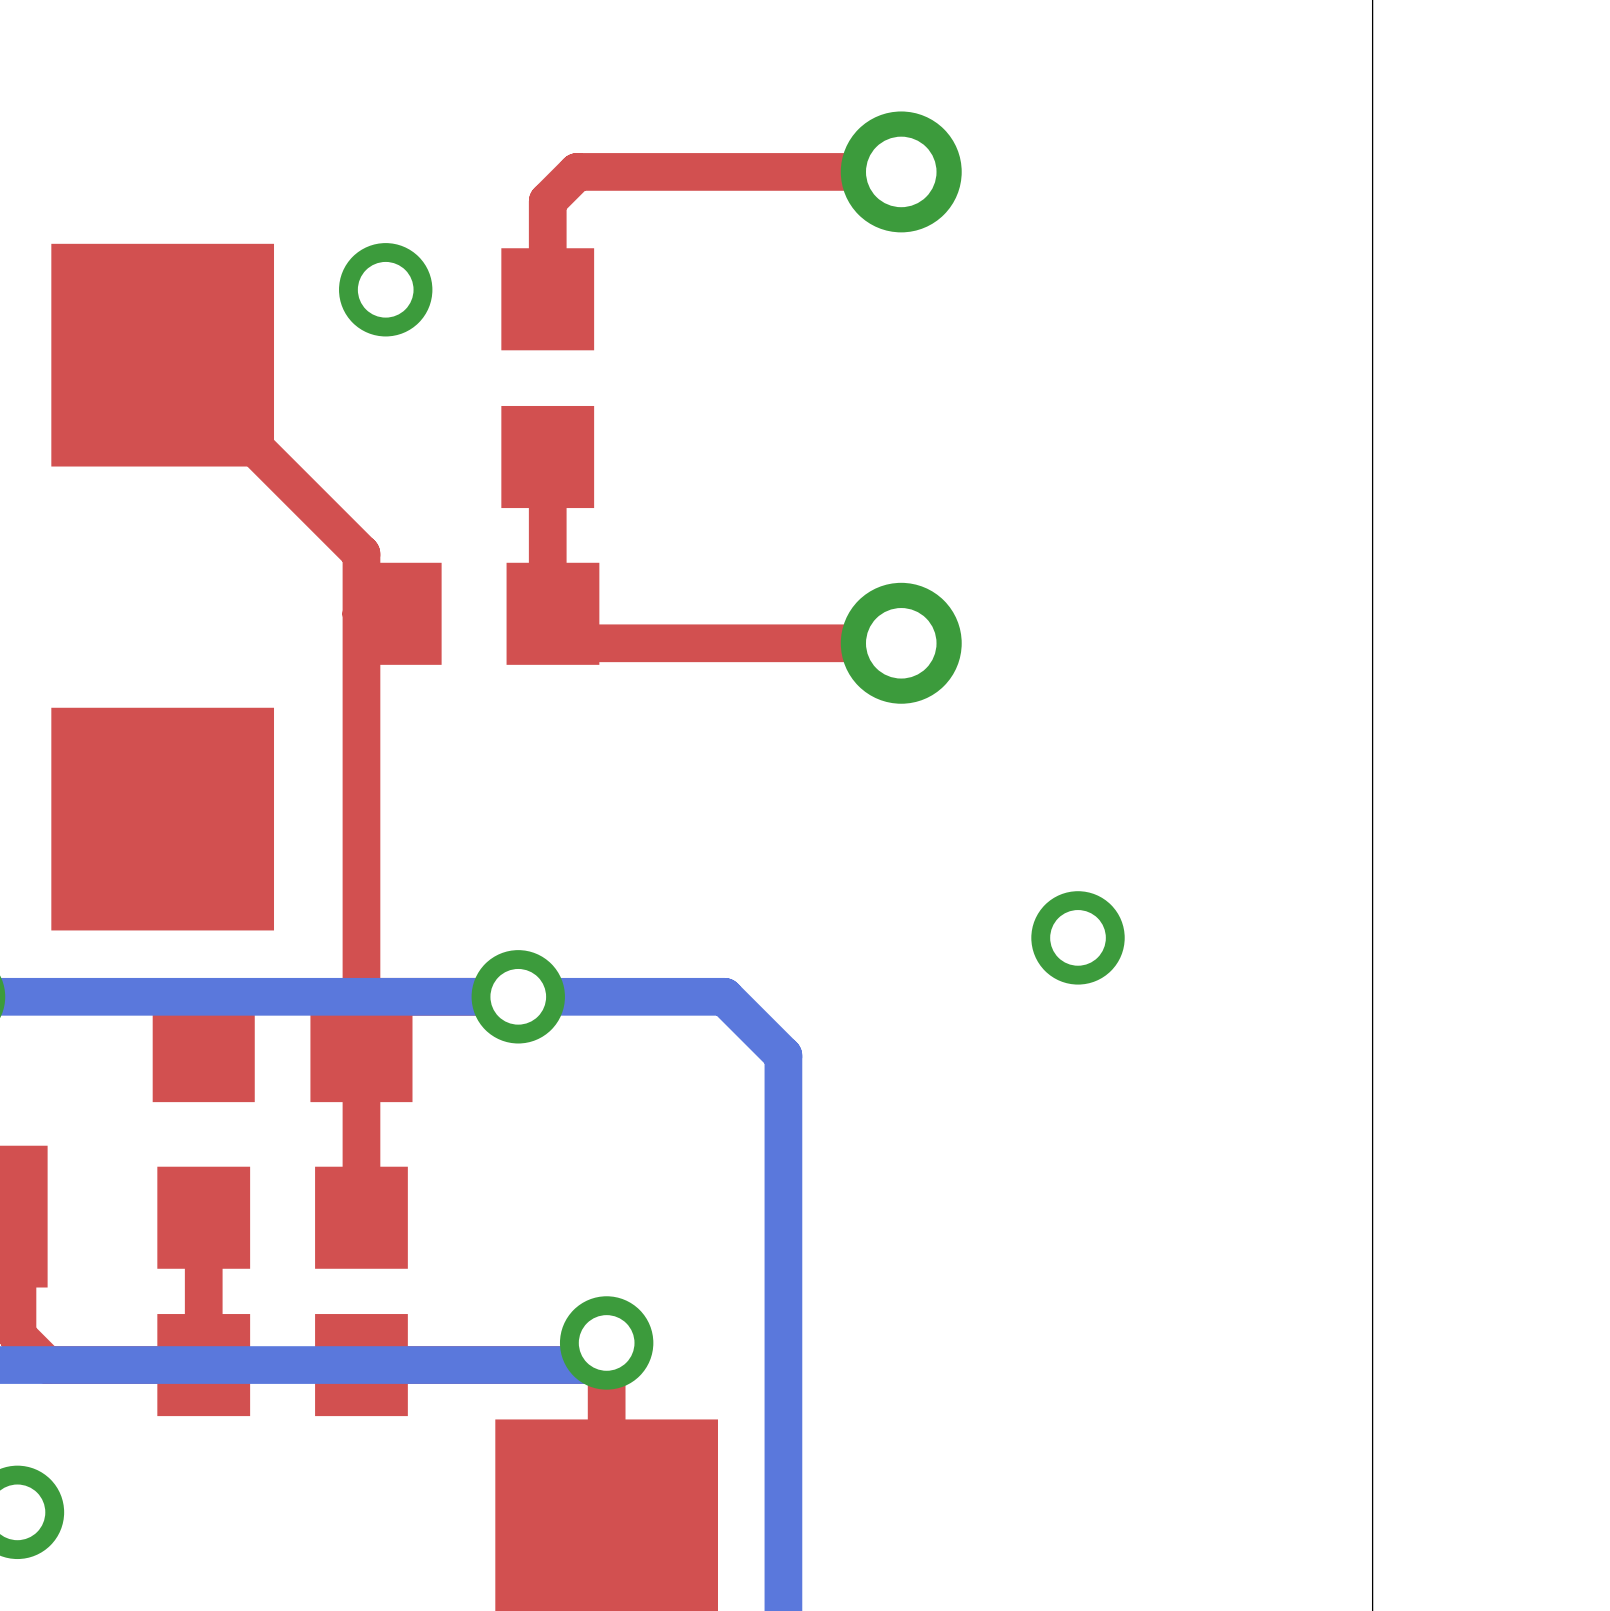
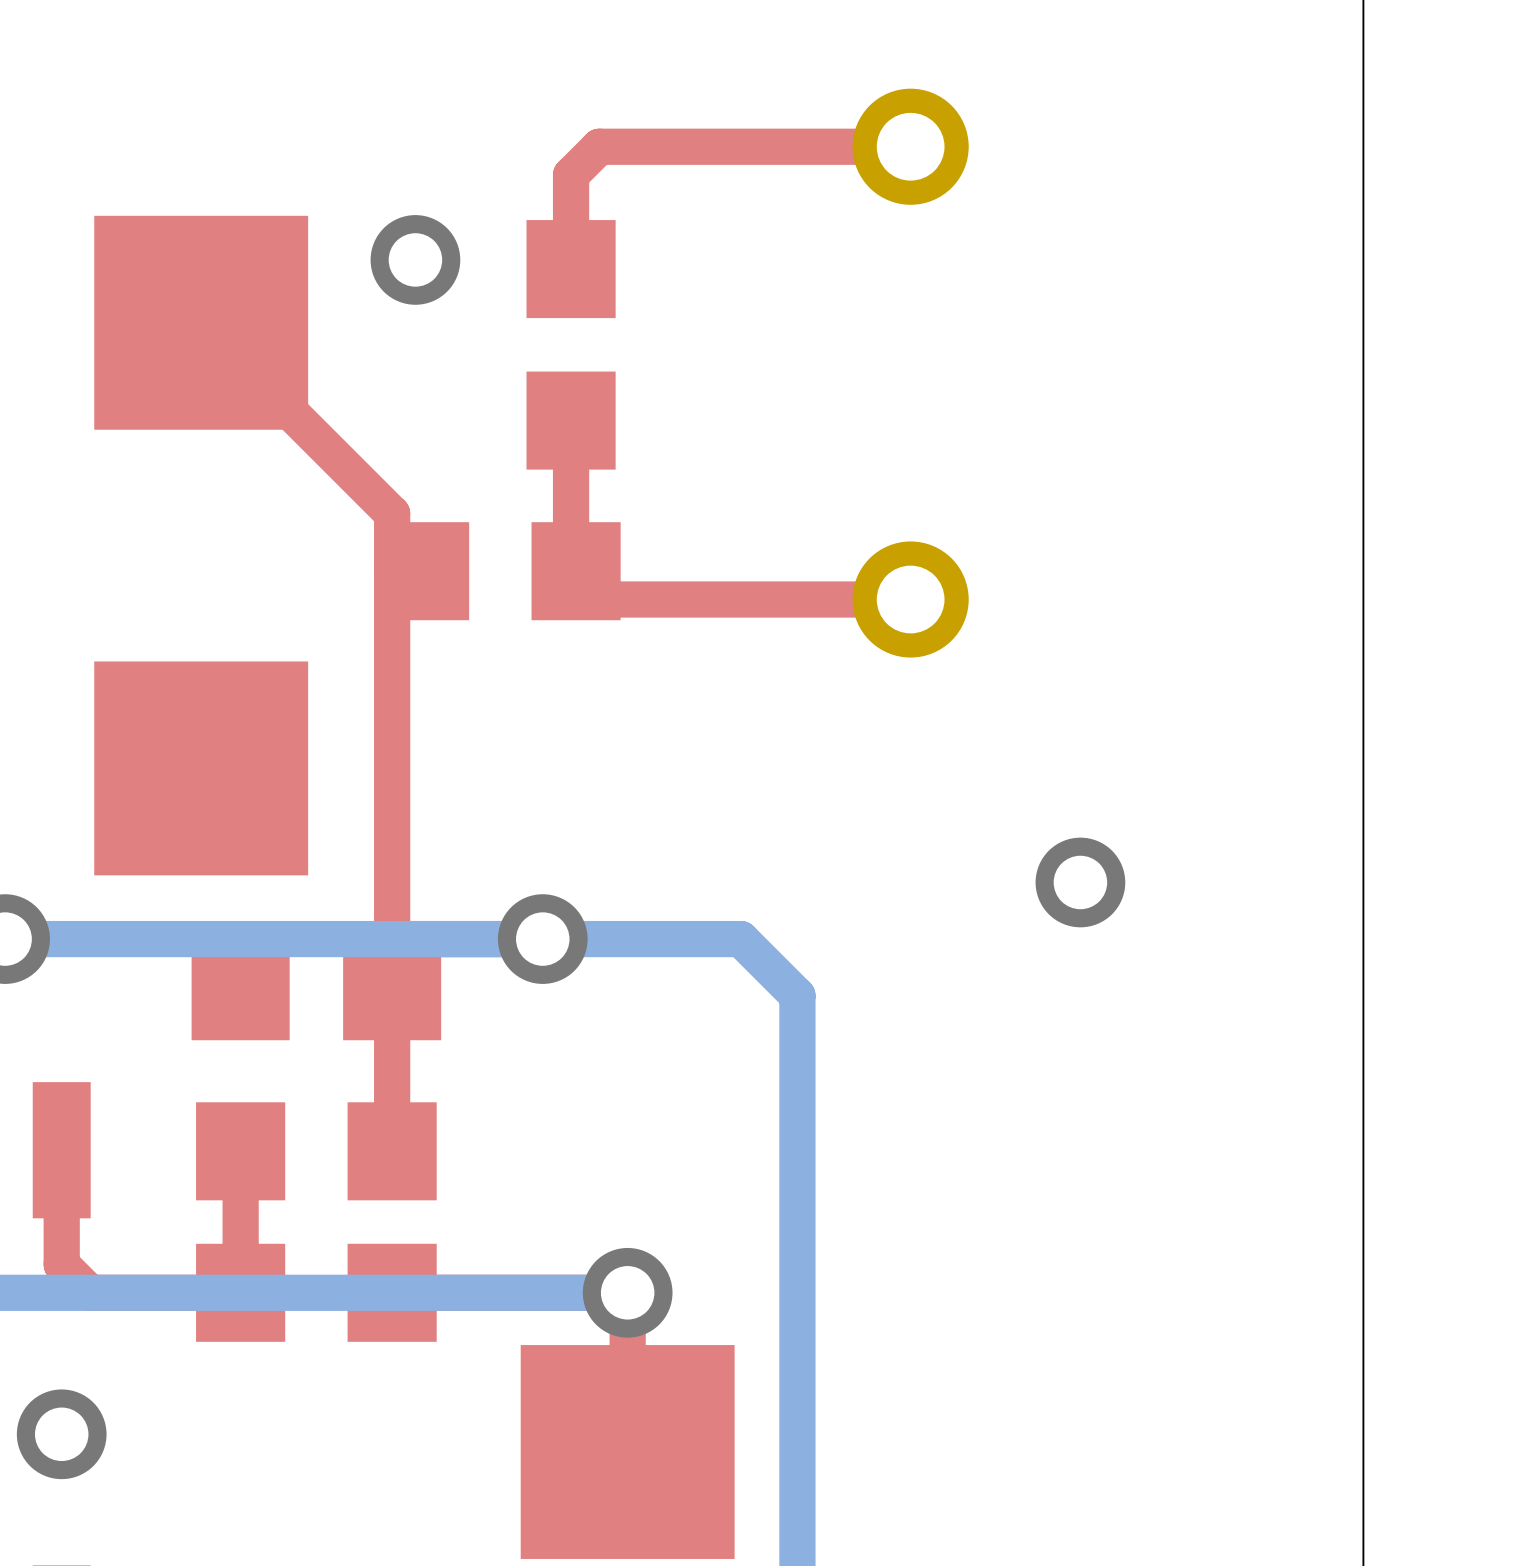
via position: (606, 1342) -> (627, 1292)

